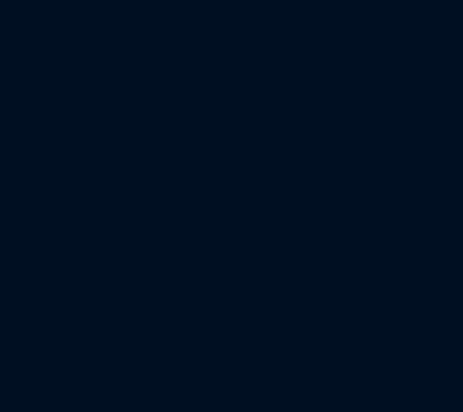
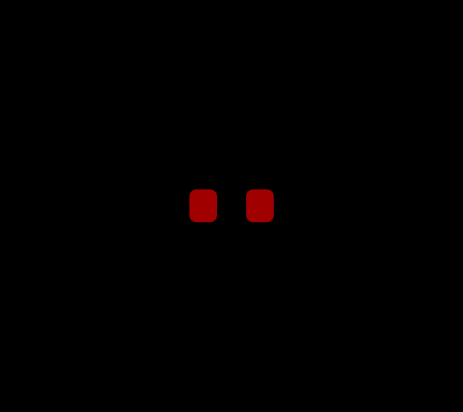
part: none -> (231, 205)

